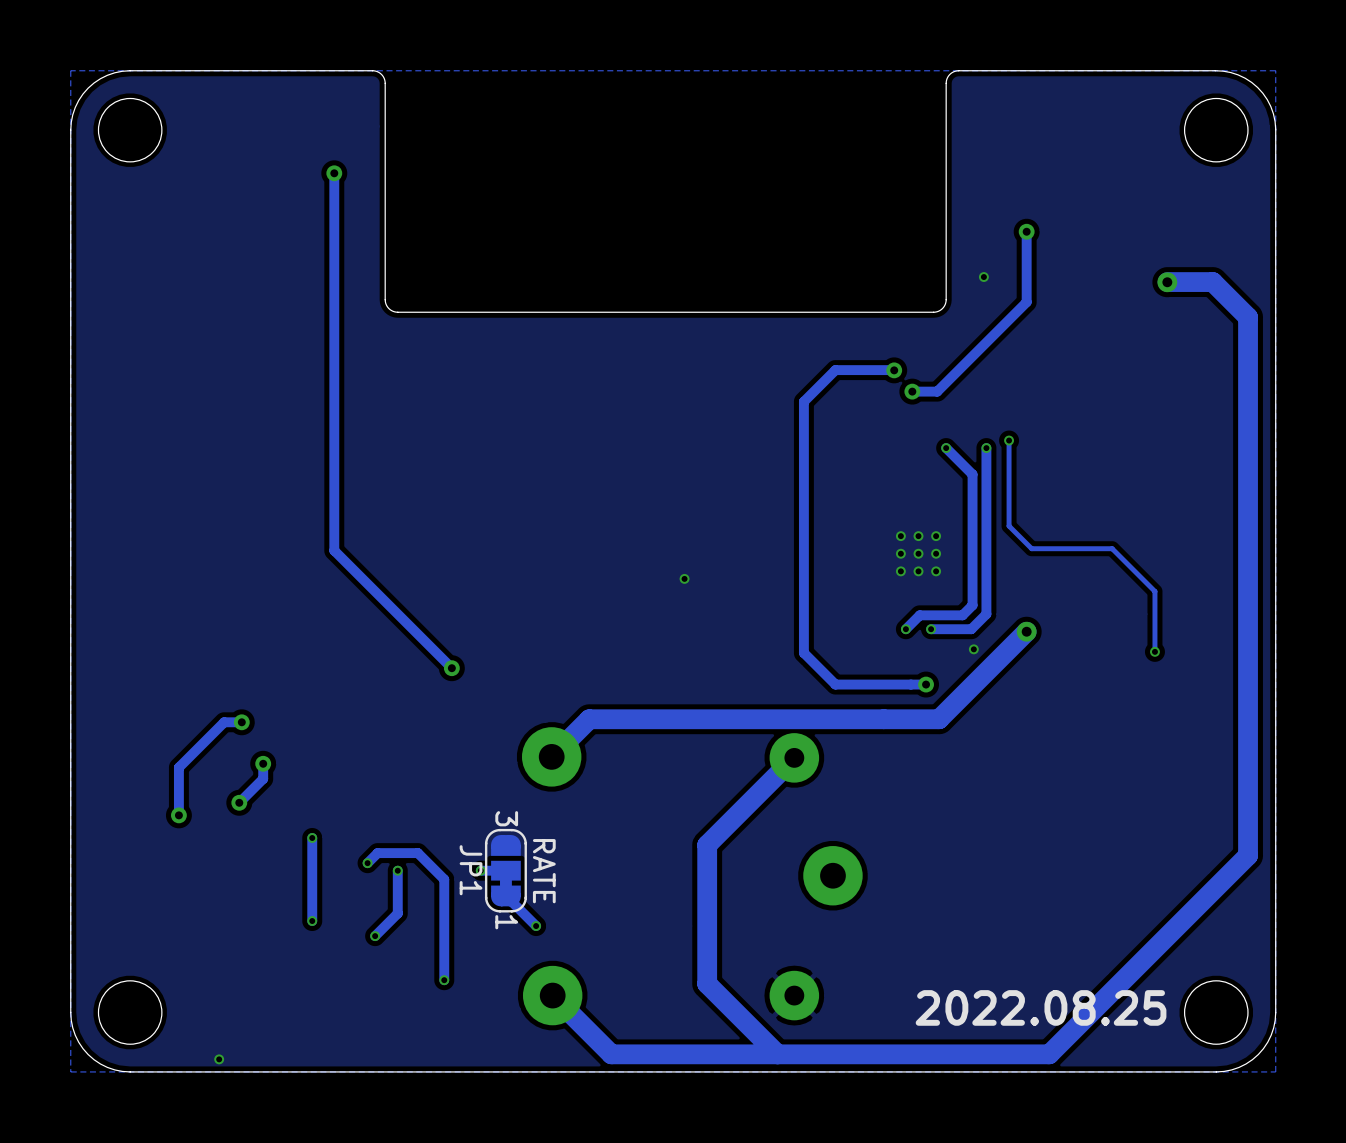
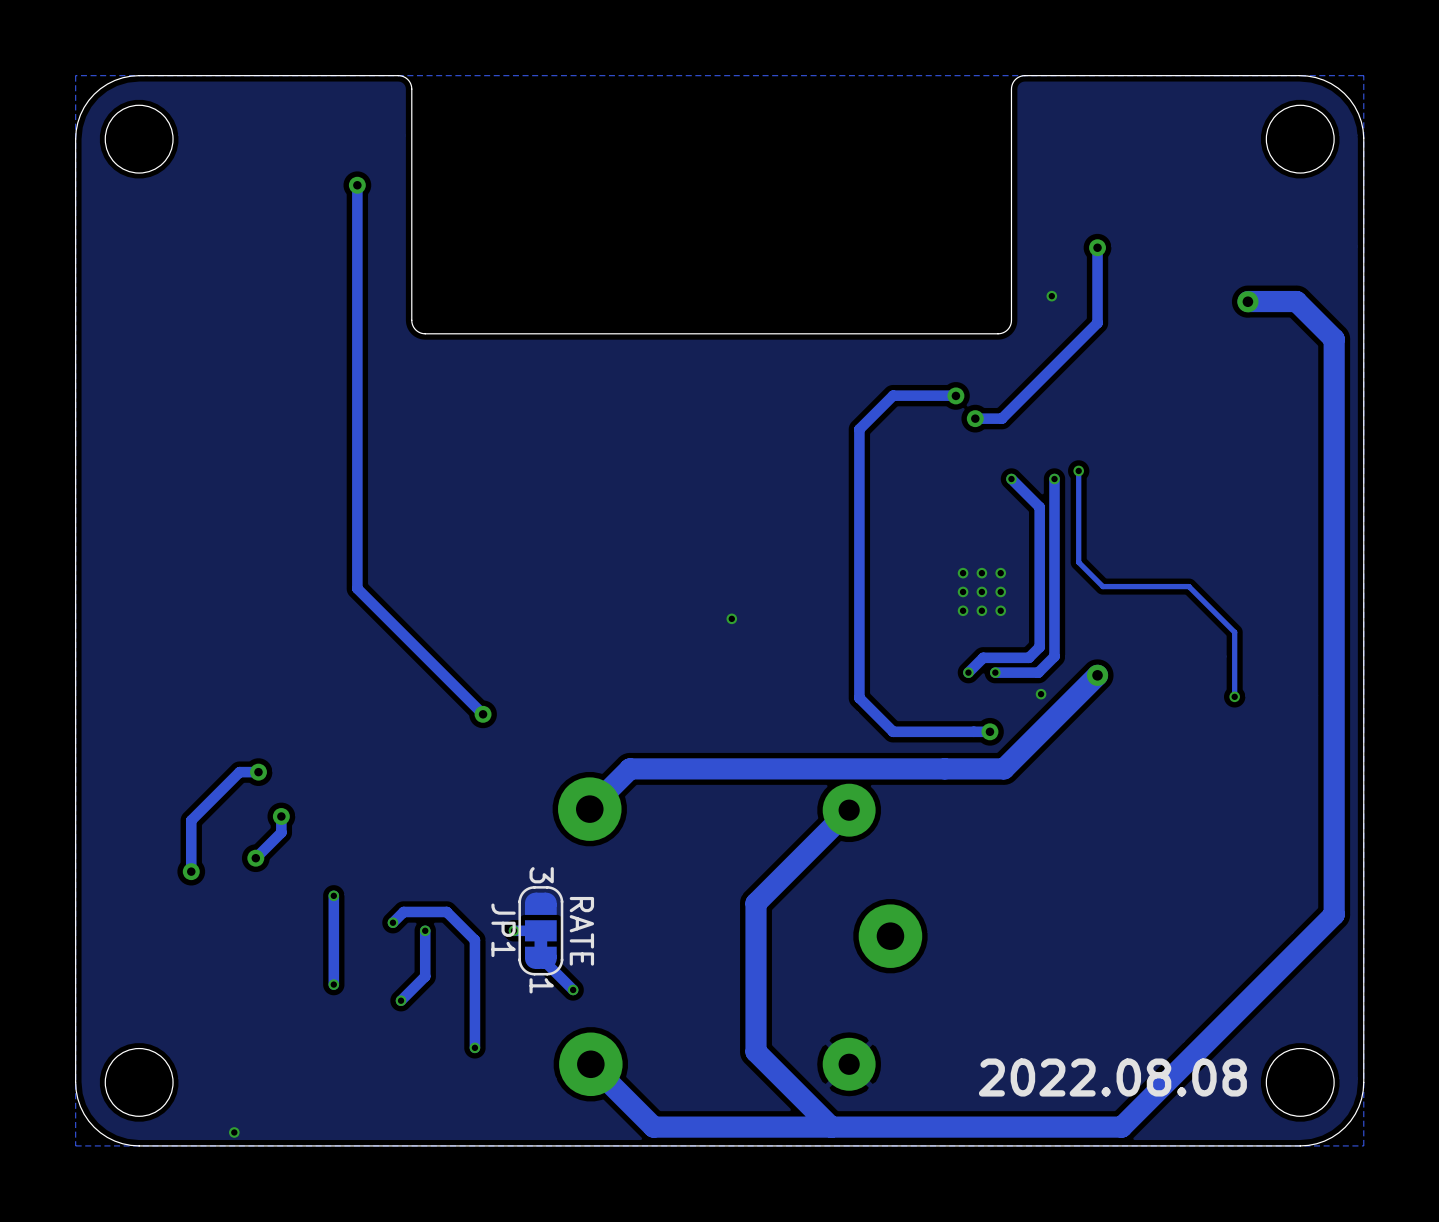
text: 2022.08.25 (1041, 1007) -> 2022.08.08 (1112, 1077)

